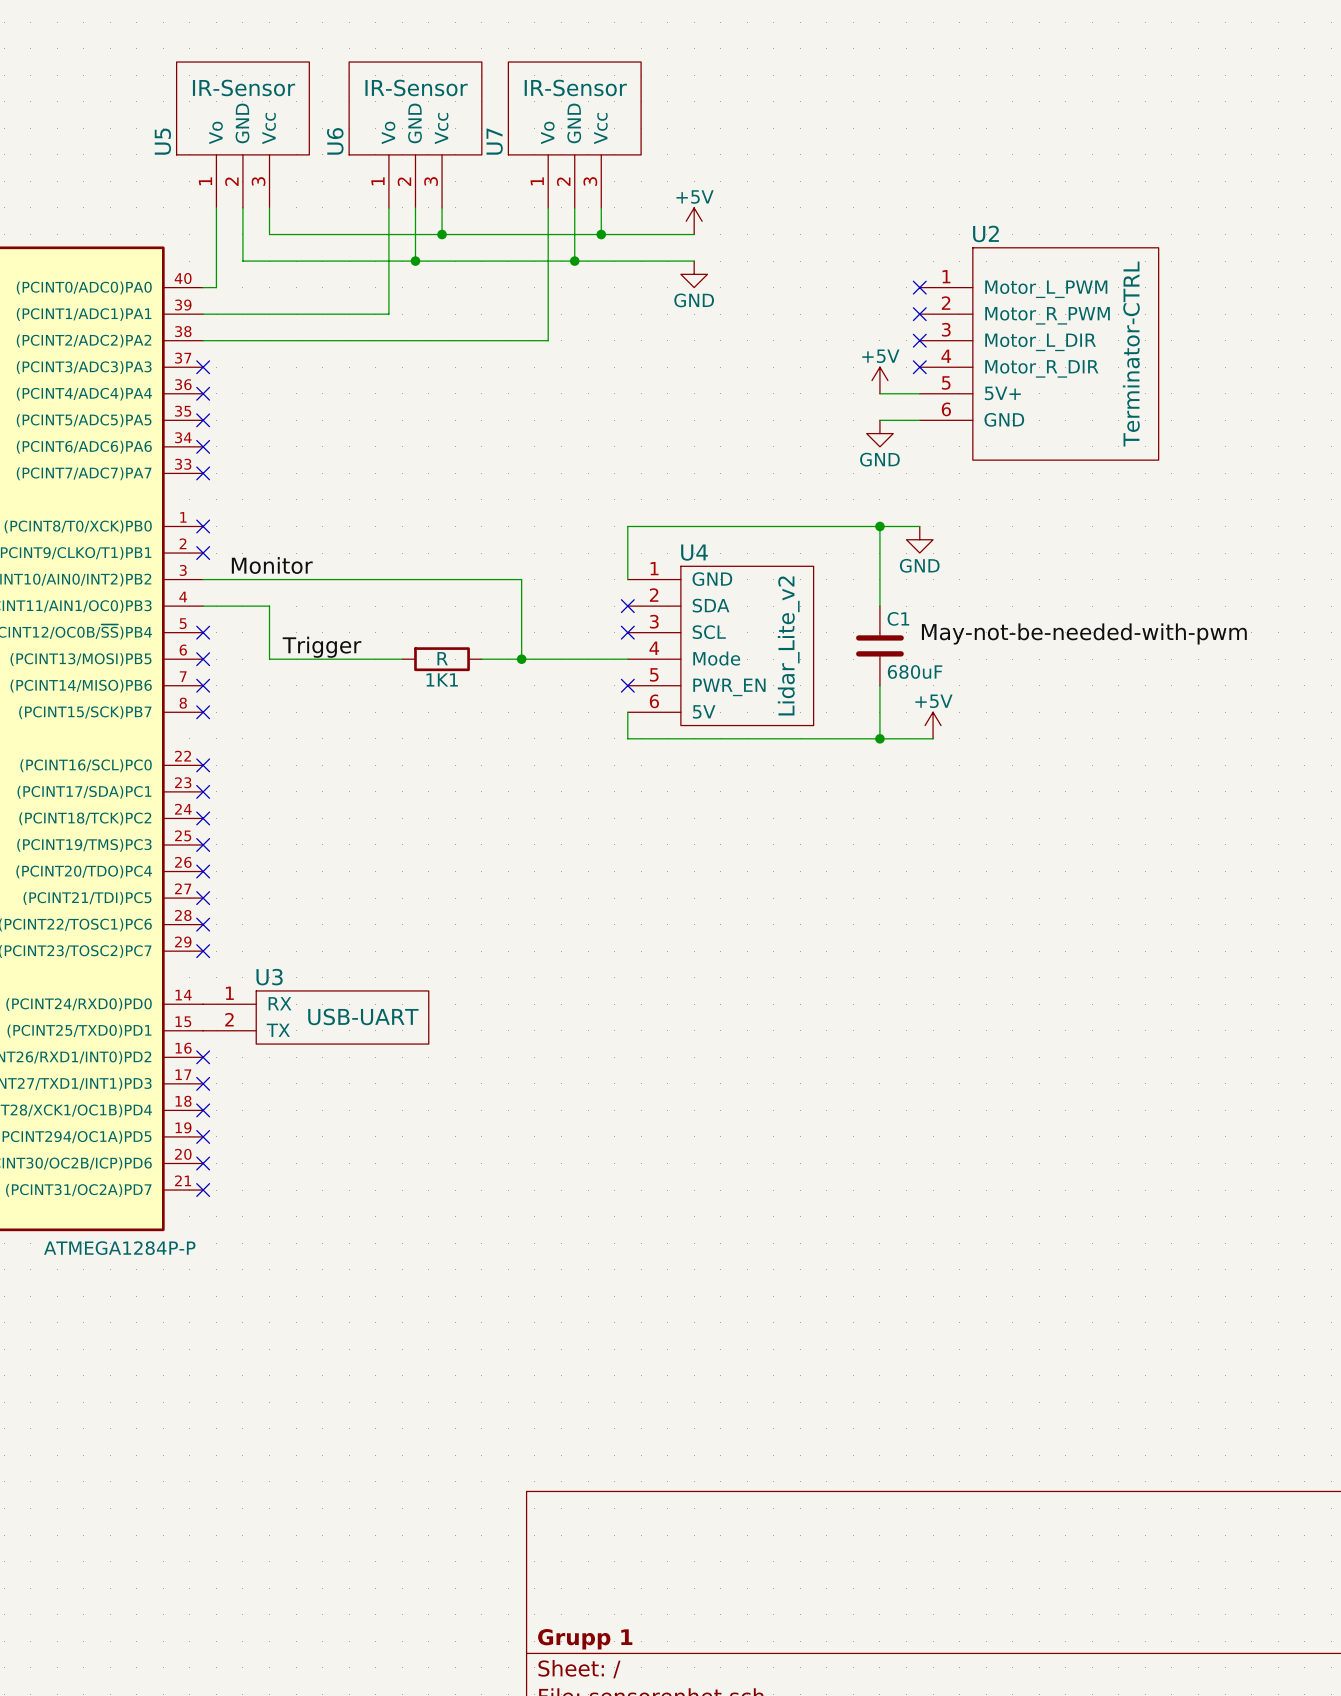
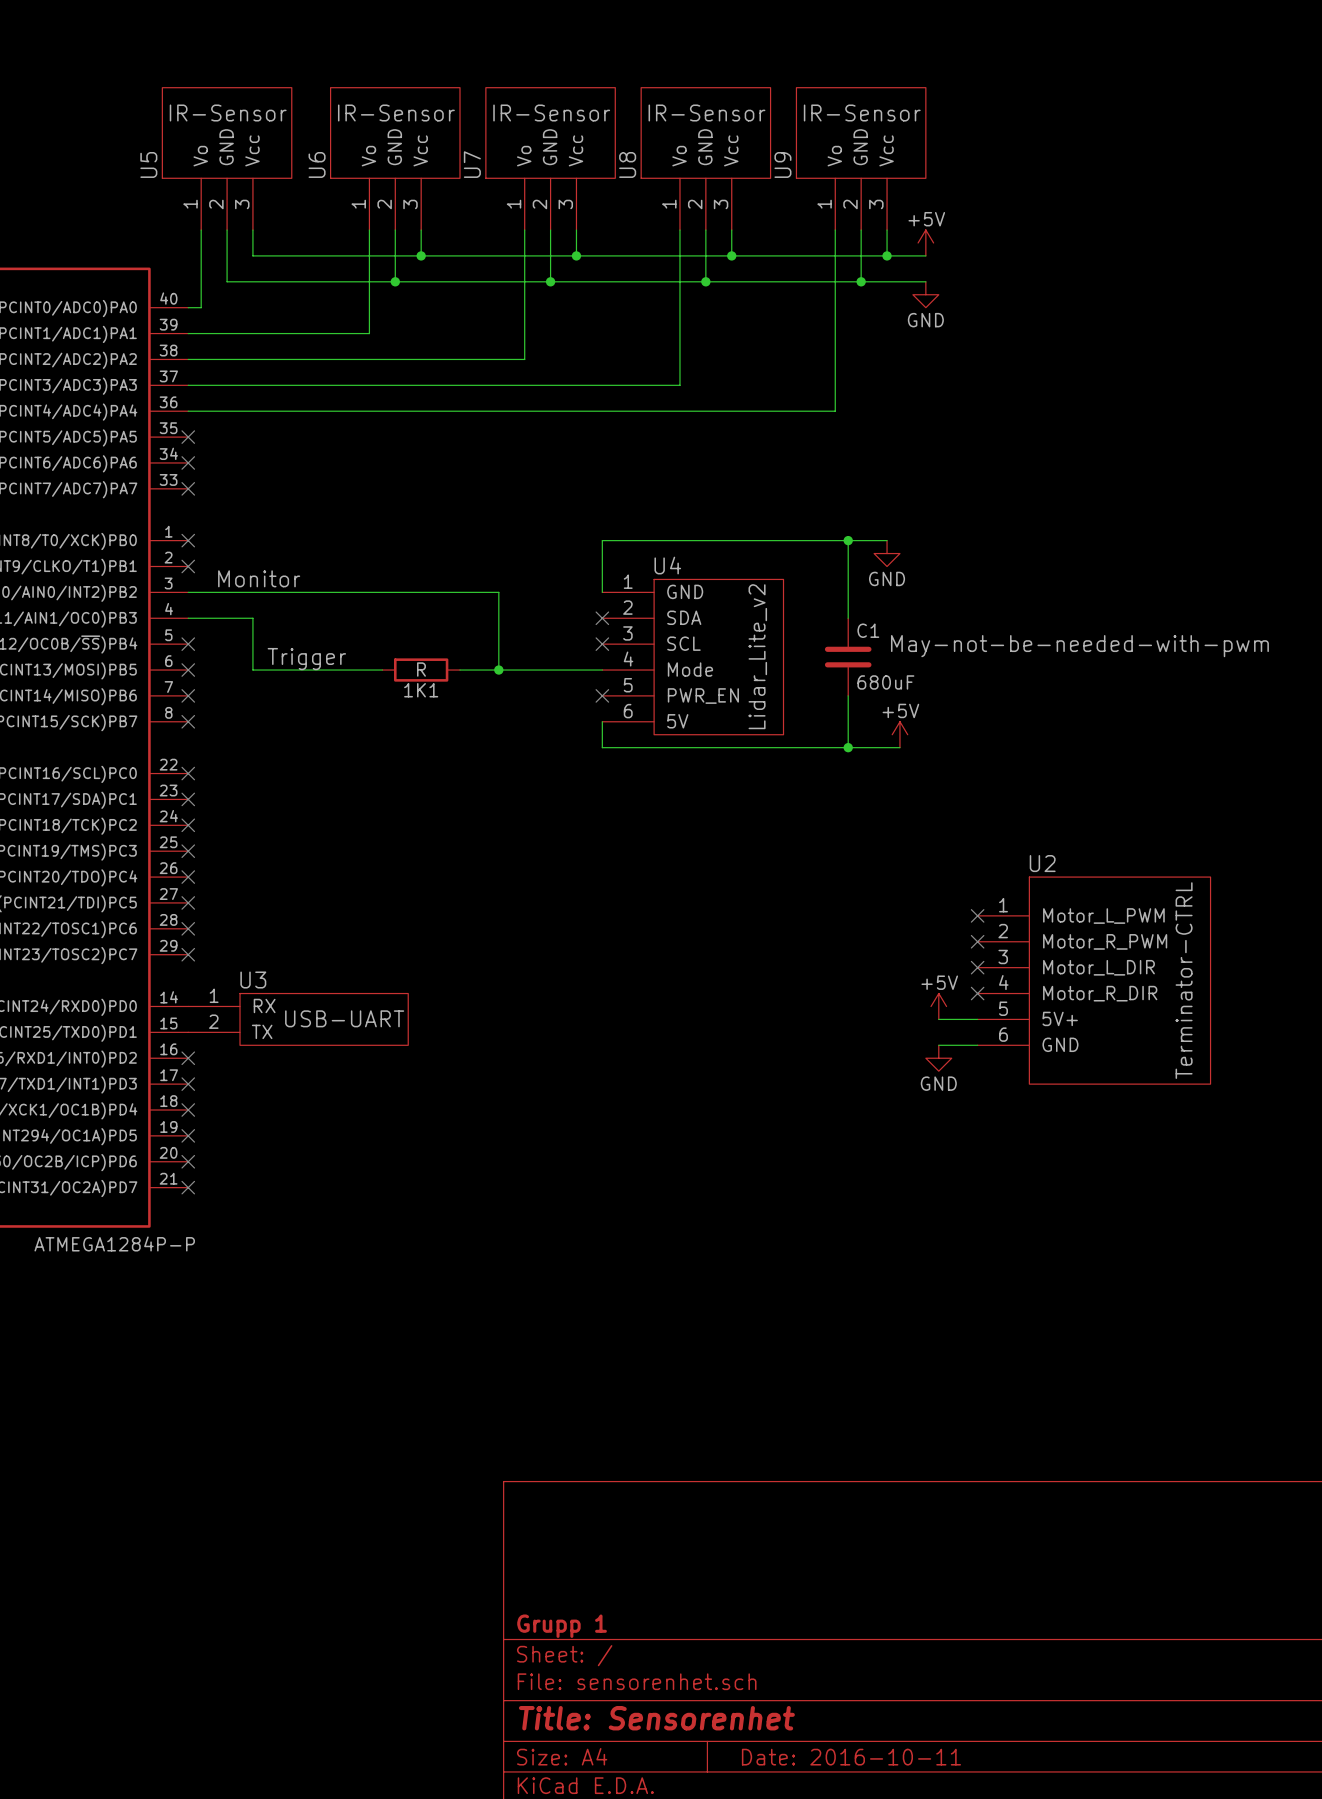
U8: none -> IR-Sensor (705, 158)
U9: none -> IR-Sensor (861, 158)
wire: none -> (679, 230) (679, 385) (188, 385)
wire: none -> (705, 230) (705, 281)
wire: none -> (731, 230) (731, 255)
wire: none -> (835, 230) (835, 411) (188, 411)
wire: none -> (861, 230) (861, 281)
wire: none -> (887, 230) (887, 255)
power symbol: +5V (694, 221) -> none
power symbol: none -> +5V (925, 242)
wire: none -> (667, 255) (925, 255)
junction: none -> (731, 255)
junction: none -> (887, 255)
wire: none -> (667, 281) (925, 281)
junction: none -> (705, 281)
junction: none -> (861, 281)
power symbol: GND (694, 274) -> none
power symbol: none -> GND (925, 294)
no-connect mark: (919, 287) -> none
no-connect mark: (919, 314) -> none
no-connect mark: (919, 340) -> none
U2 position: (1039, 353) -> (1094, 980)
no-connect mark: (203, 367) -> none
no-connect mark: (919, 367) -> none
power symbol: +5V (879, 380) -> none
no-connect mark: (203, 393) -> none
wire: (879, 393) (919, 393) -> none
wire: (879, 420) (919, 420) -> none
power symbol: GND (879, 433) -> none
no-connect mark: none -> (977, 915)
no-connect mark: none -> (977, 941)
no-connect mark: none -> (977, 967)
no-connect mark: none -> (977, 993)
power symbol: none -> +5V (938, 1006)
wire: none -> (938, 1019) (977, 1019)
wire: none -> (938, 1045) (977, 1045)
power symbol: none -> GND (938, 1058)

